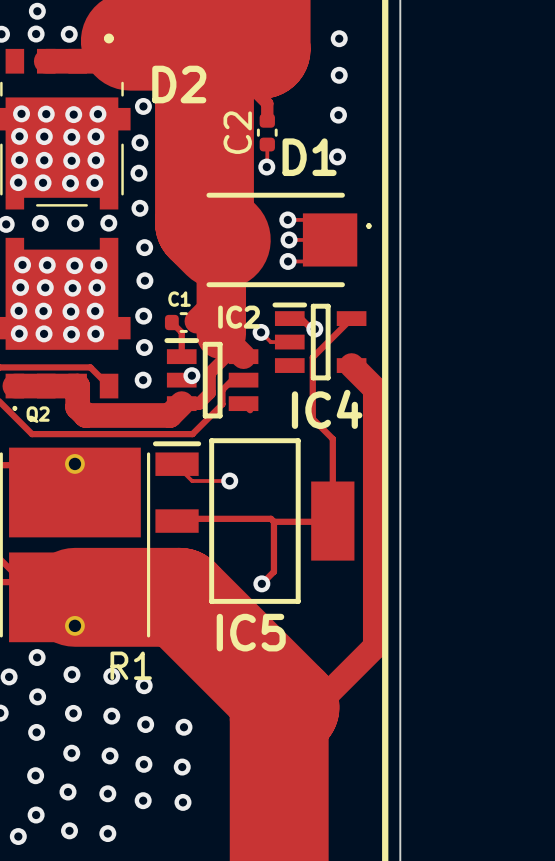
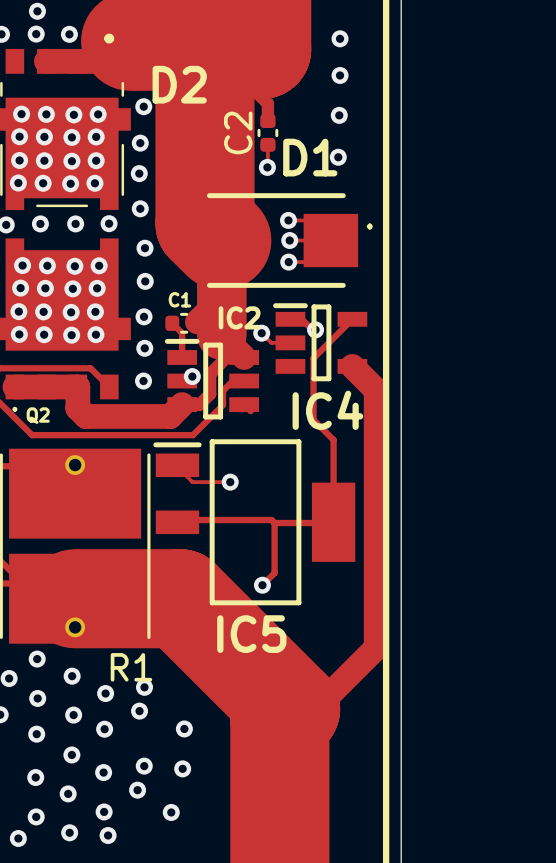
via position: (111, 676) -> (105, 693)
via position: (111, 716) -> (104, 729)
via position: (145, 724) -> (139, 711)
via position: (110, 755) -> (103, 772)
via position: (107, 793) -> (104, 811)
via position: (143, 800) -> (137, 790)
via position: (182, 802) -> (171, 812)

